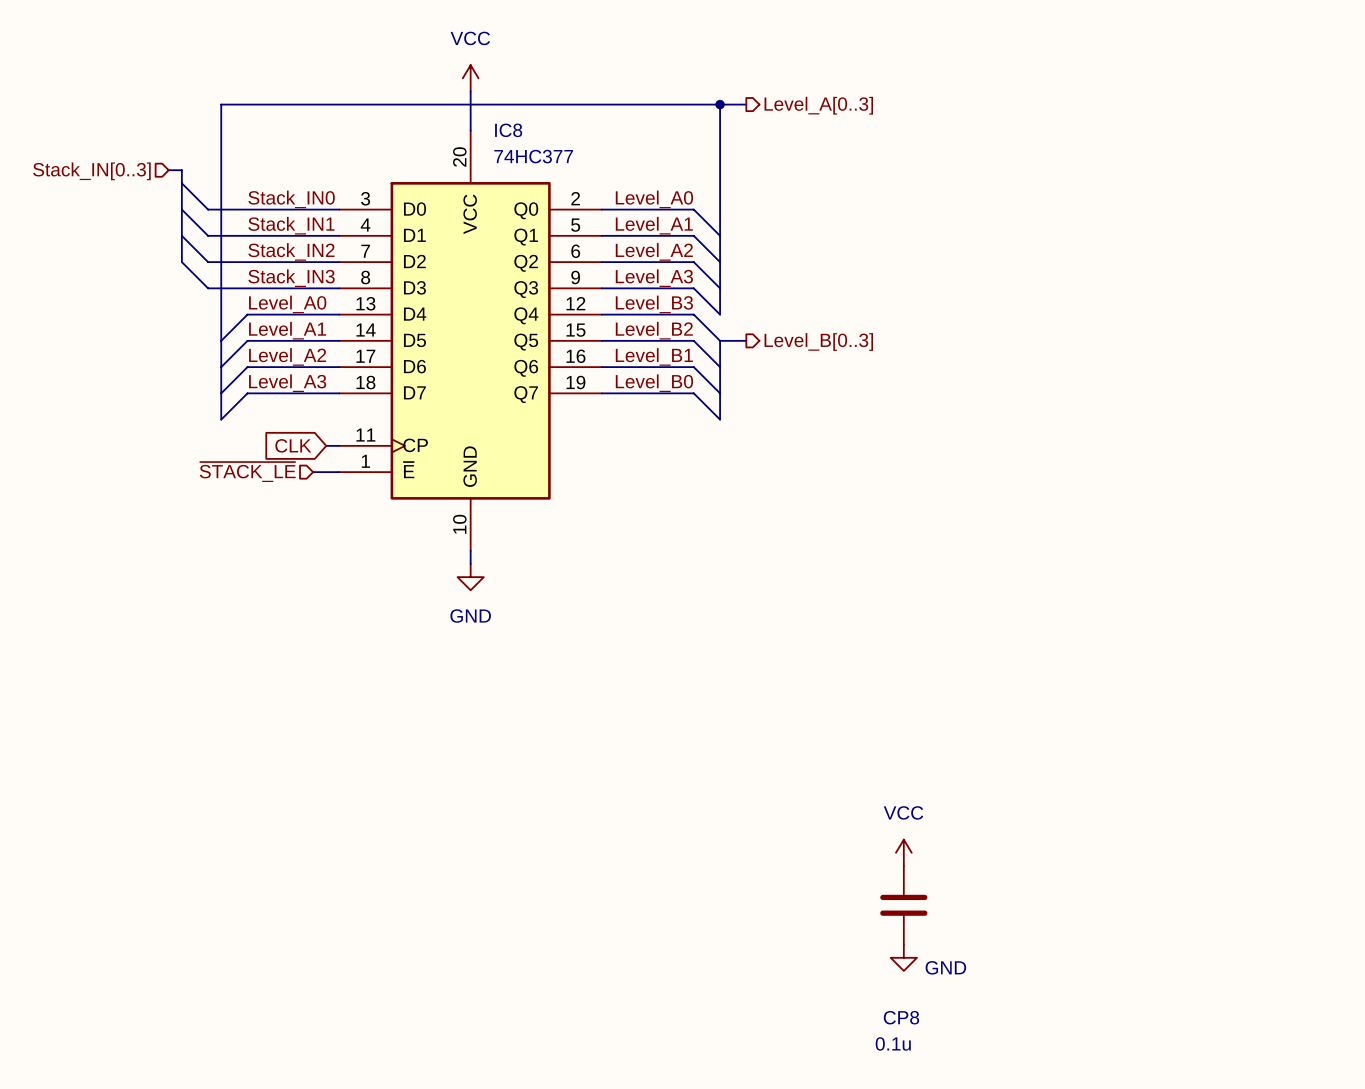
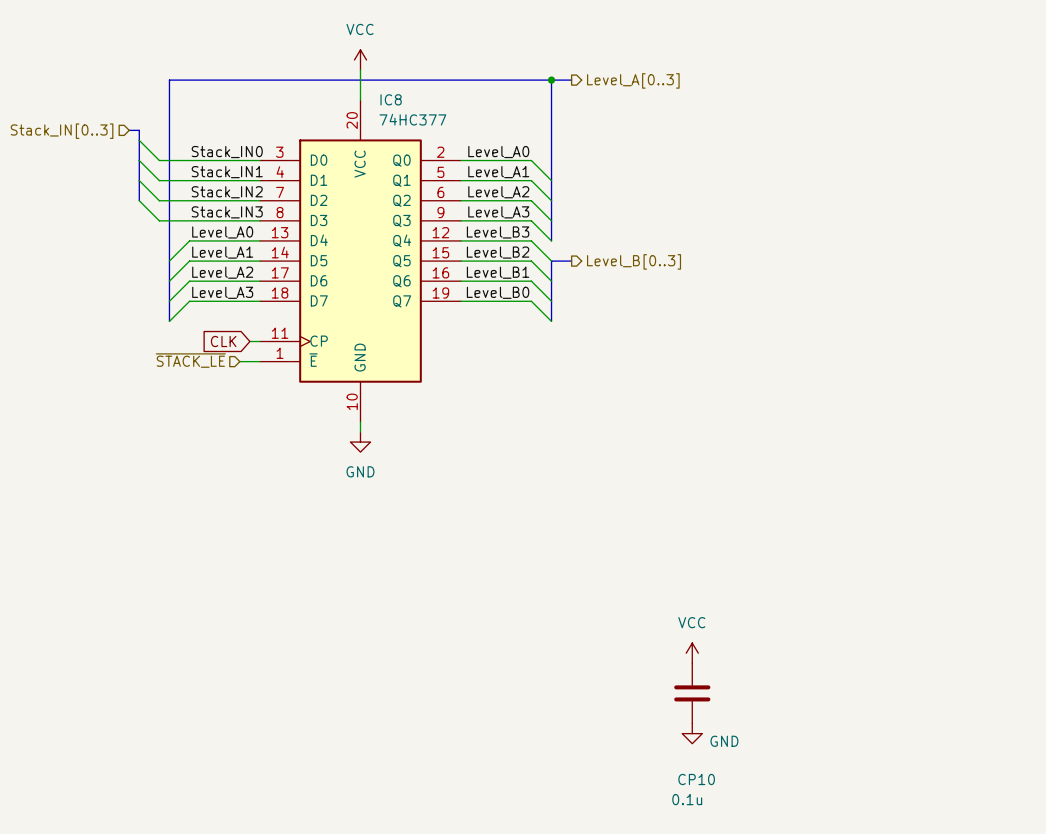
CP8 name: CP8 (901, 1017) -> CP10 (696, 779)

